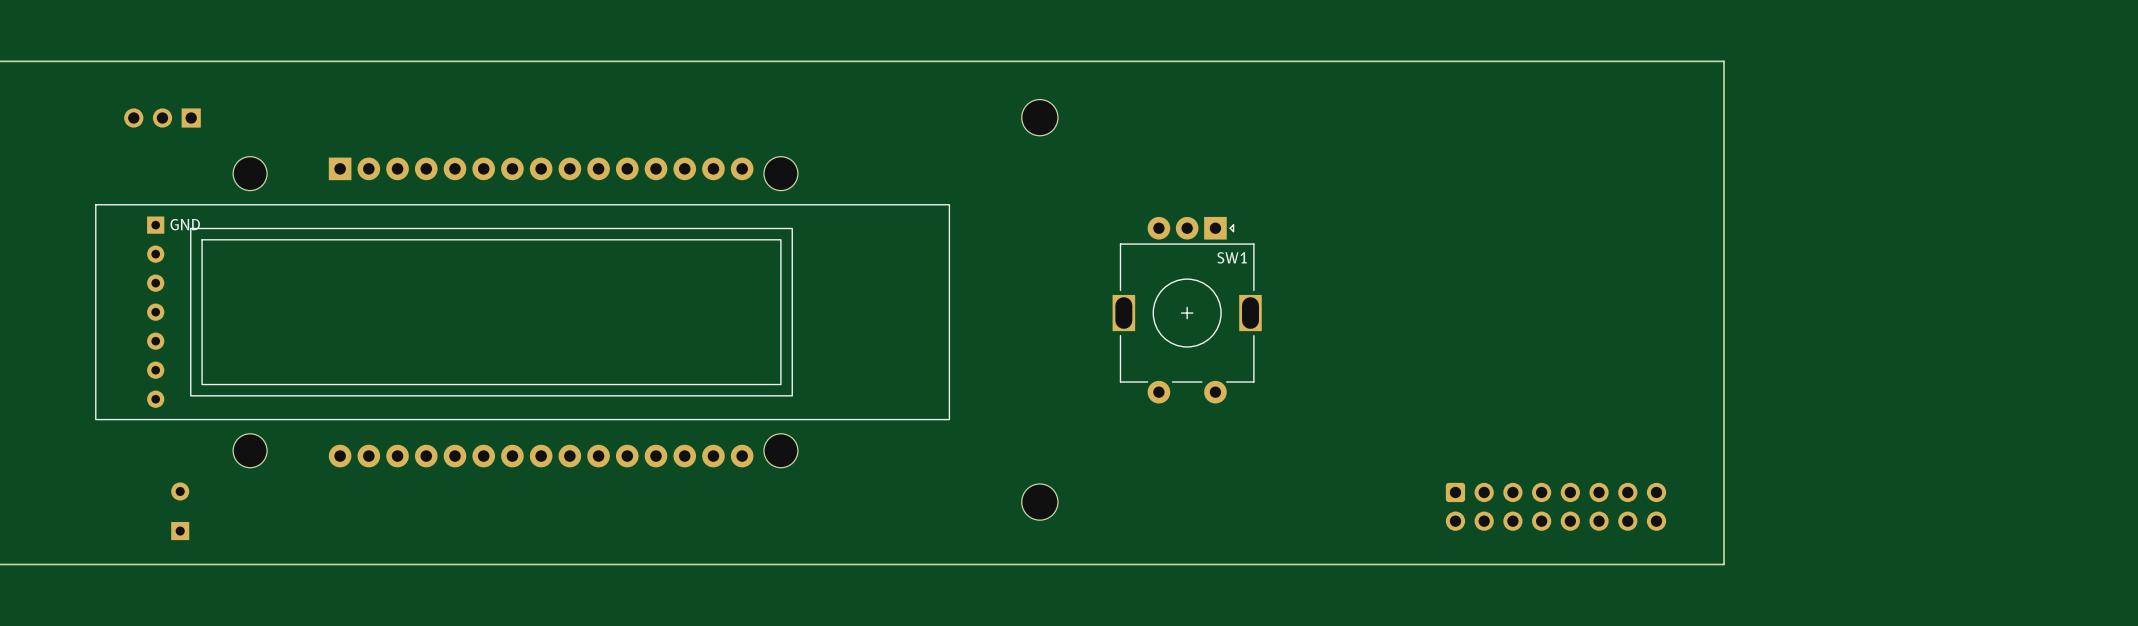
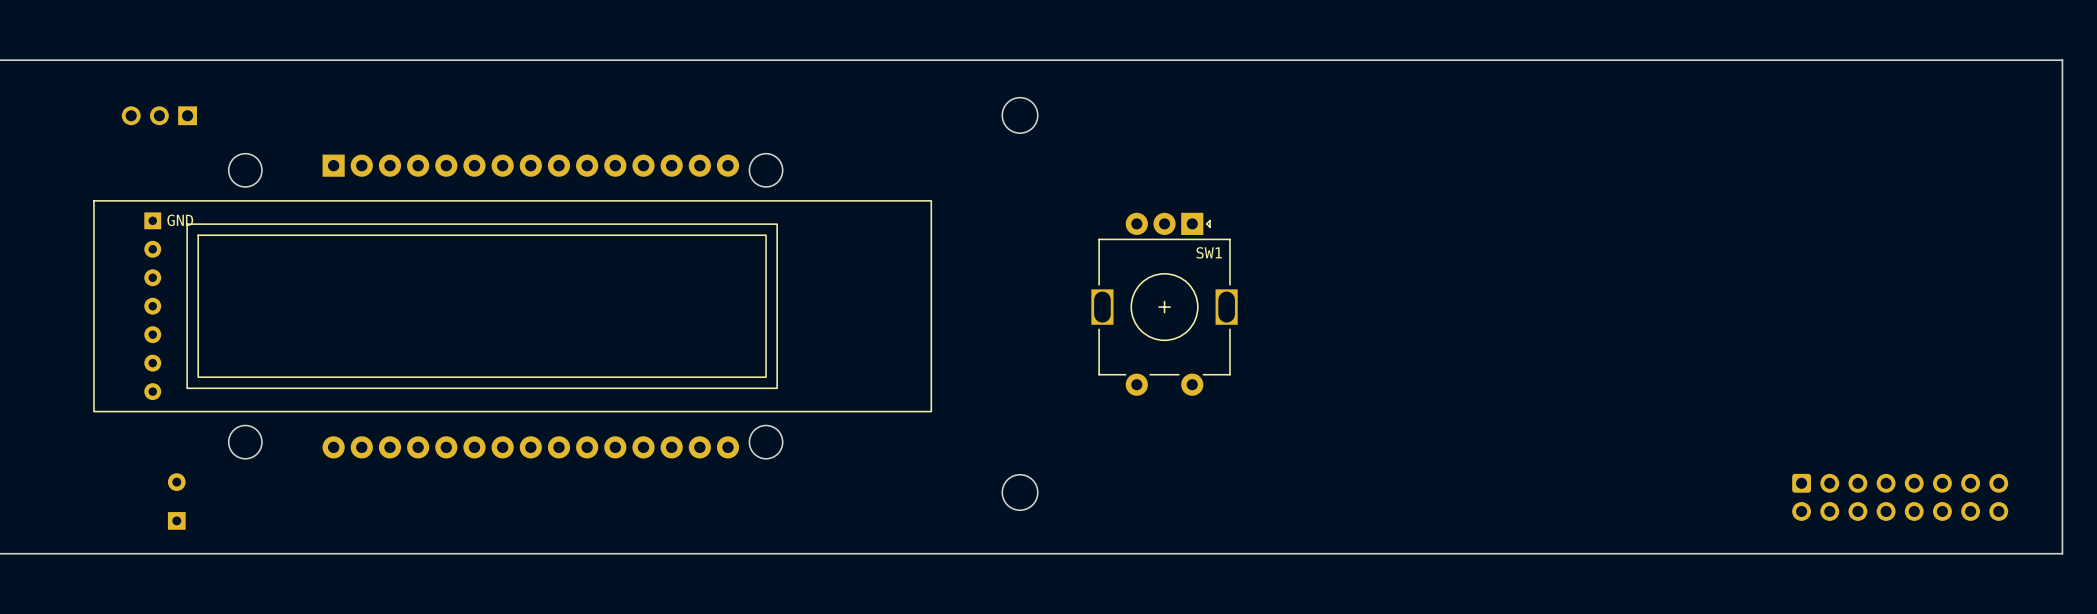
board edge: (1724, 61) (1724, 564) -> (1691, 60) (2062, 60) (2062, 553) (1691, 553)
part: (1555, 506) -> none
part: none -> (1900, 497)

